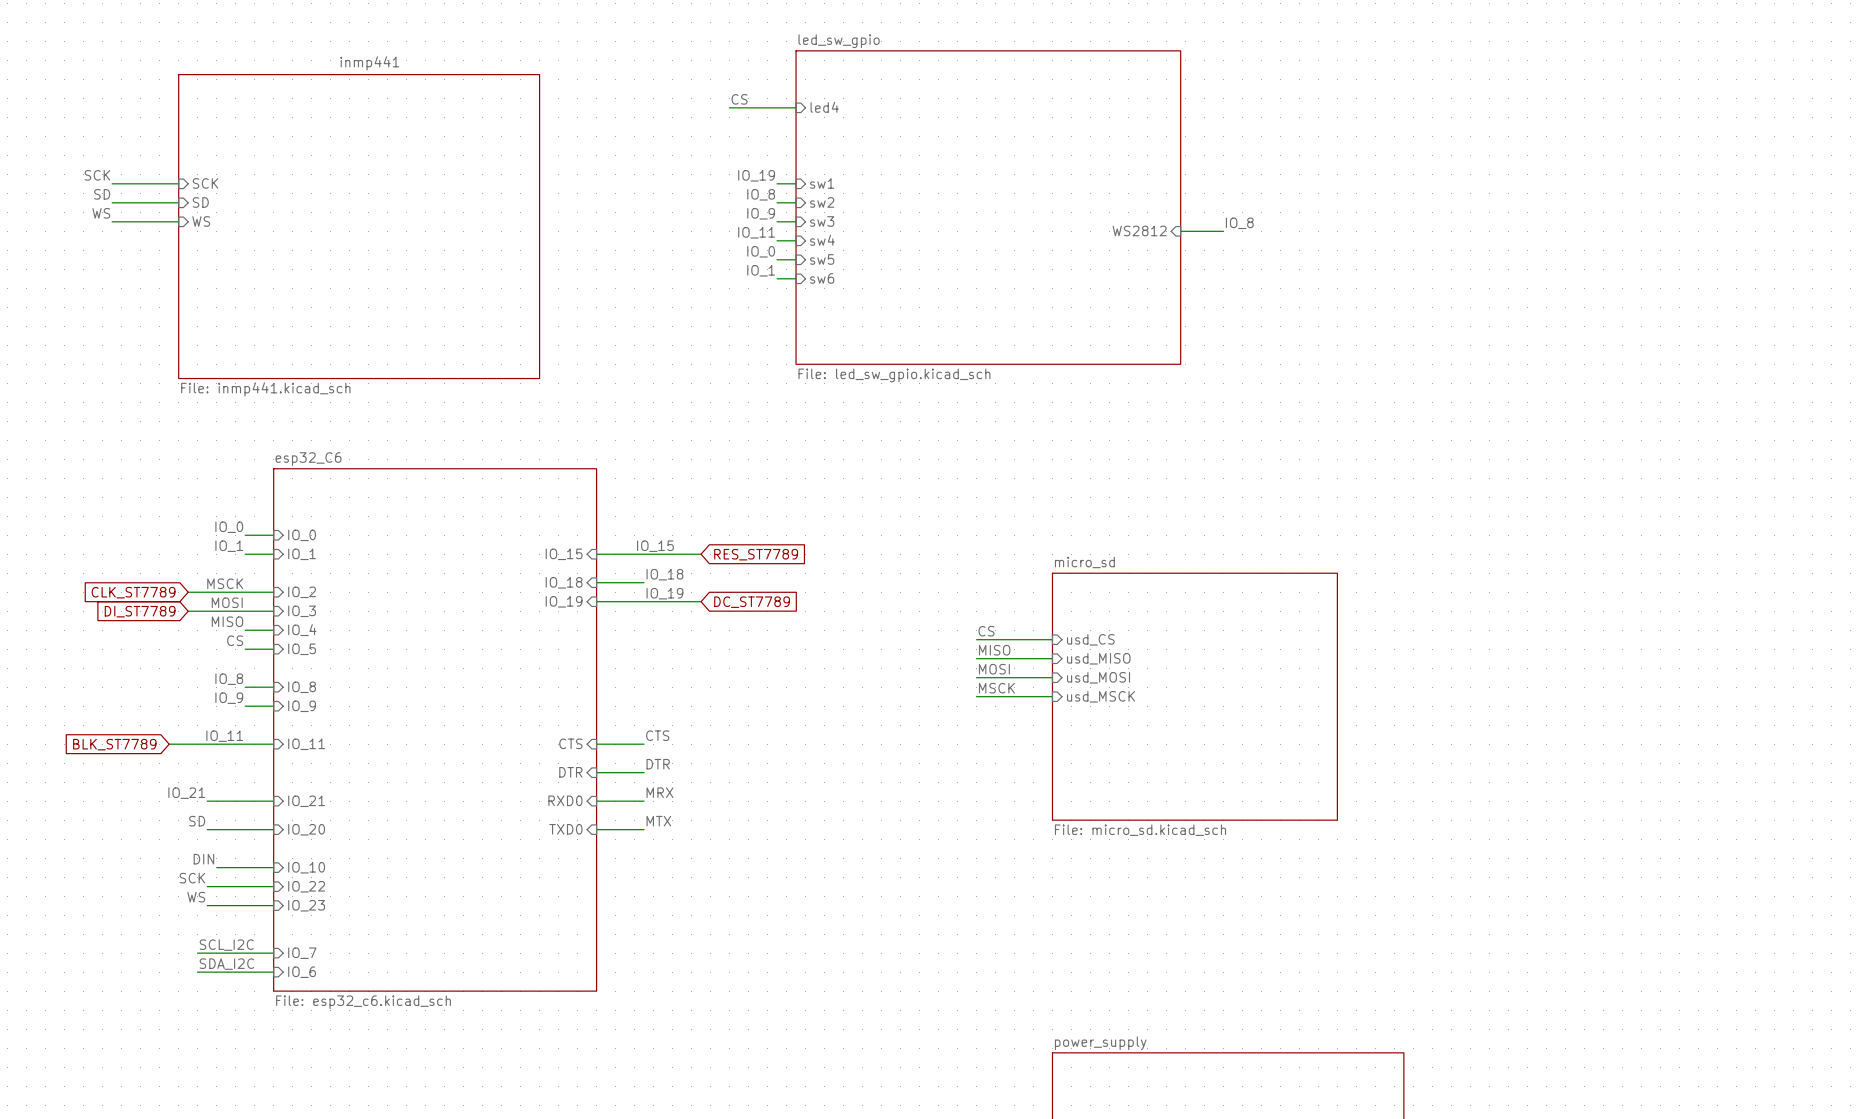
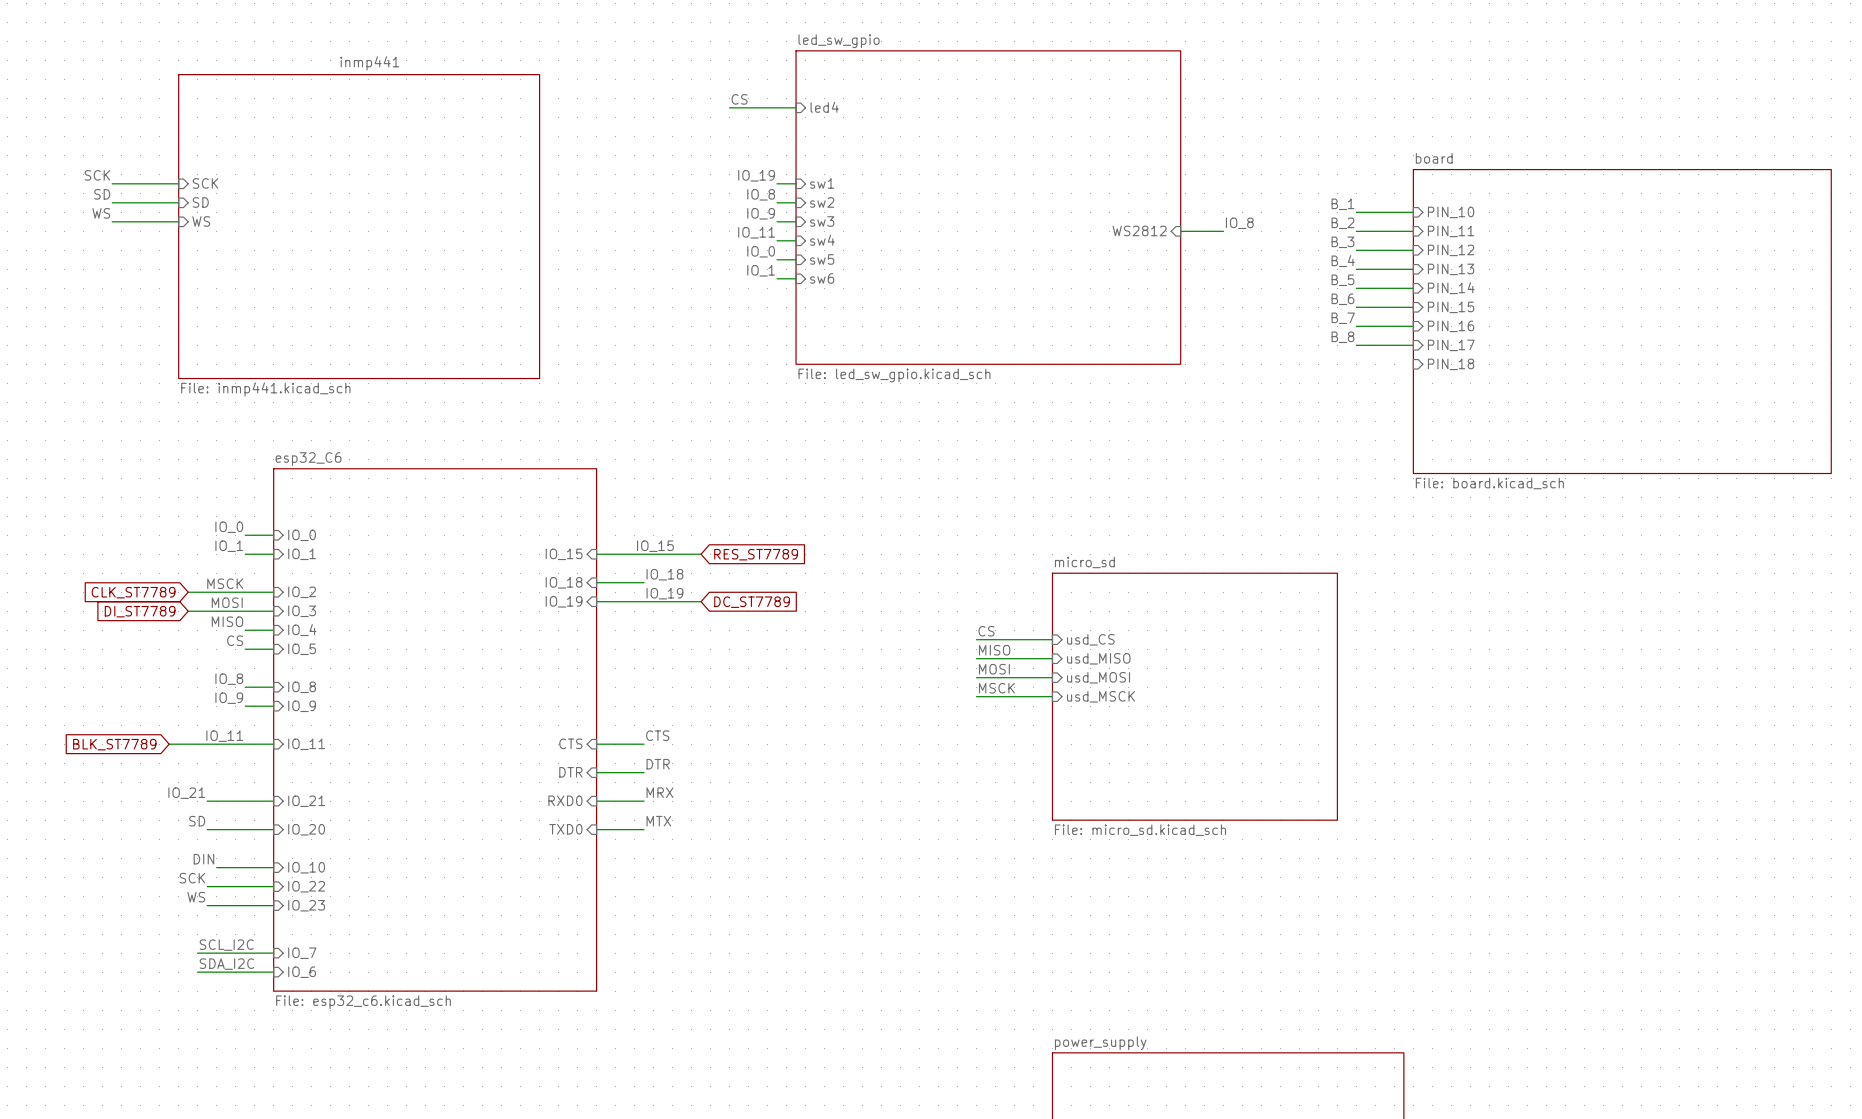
label: none -> B_1 (1342, 204)
wire: none -> (1356, 212) (1413, 212)
sheet pin: none -> PIN_10 (1451, 212)
label: none -> B_2 (1342, 223)
wire: none -> (1356, 231) (1413, 231)
sheet pin: none -> PIN_11 (1451, 231)
label: none -> B_3 (1342, 242)
wire: none -> (1356, 250) (1413, 250)
sheet pin: none -> PIN_12 (1451, 250)
label: none -> B_4 (1343, 261)
wire: none -> (1356, 269) (1413, 269)
sheet pin: none -> PIN_13 (1451, 269)
label: none -> B_5 (1342, 280)
wire: none -> (1356, 288) (1413, 288)
sheet pin: none -> PIN_14 (1451, 288)
label: none -> B_6 (1342, 299)
wire: none -> (1356, 307) (1413, 307)
sheet pin: none -> PIN_15 (1451, 307)
label: none -> B_7 (1343, 318)
sheet board: none -> File: board.kicad_sch (1622, 321)
wire: none -> (1356, 326) (1413, 326)
sheet pin: none -> PIN_16 (1451, 326)
label: none -> B_8 (1342, 337)
wire: none -> (1356, 345) (1413, 345)
sheet pin: none -> PIN_17 (1451, 345)
sheet pin: none -> PIN_18 (1451, 364)

